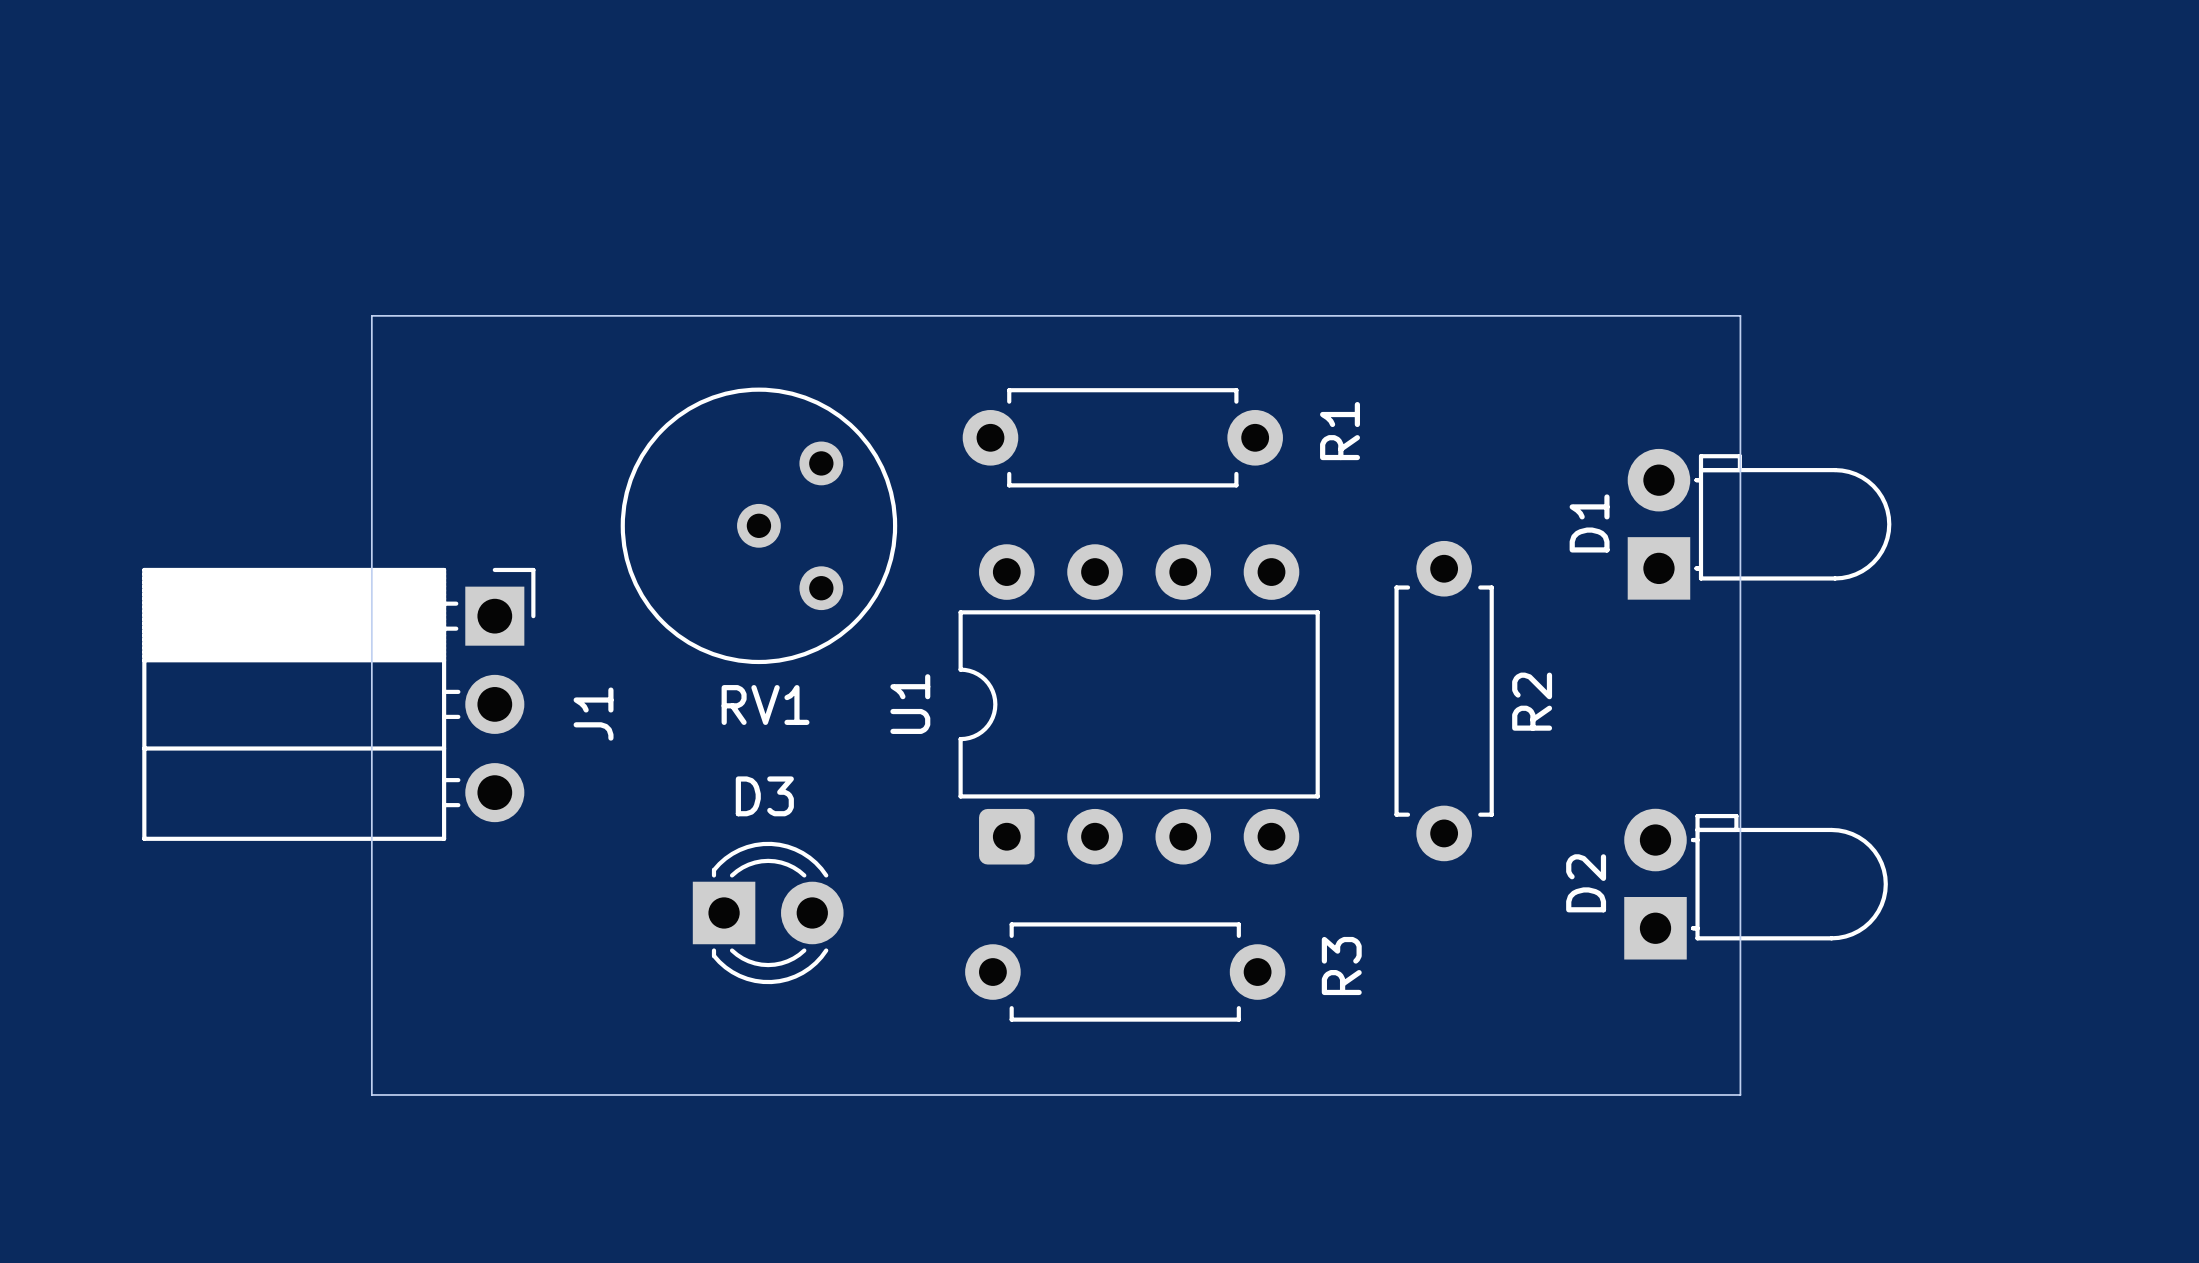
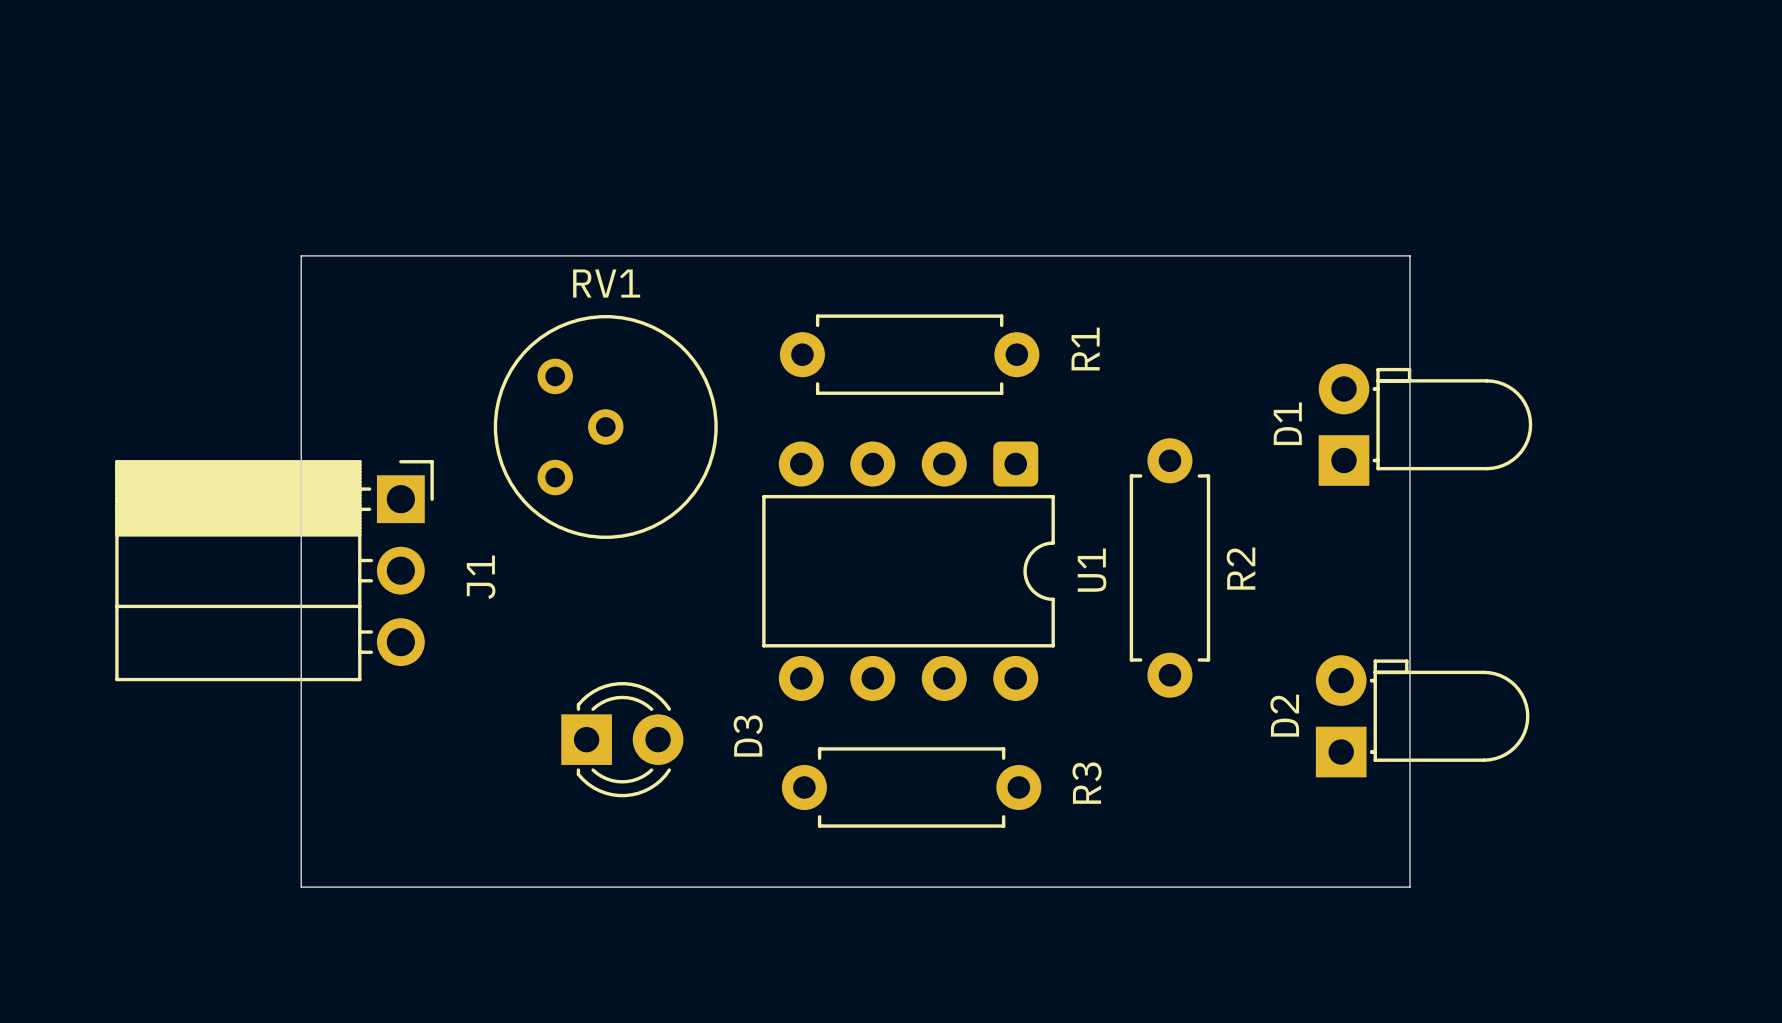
RV1 rotation: 0° (758, 525) -> 180° (605, 426)
U1 rotation: 0° (1139, 704) -> 180° (908, 571)
D3 name rotation: 0° (764, 796) -> 90° counterclockwise (748, 736)
D3 name position: D3 (764, 796) -> D3 (748, 736)

